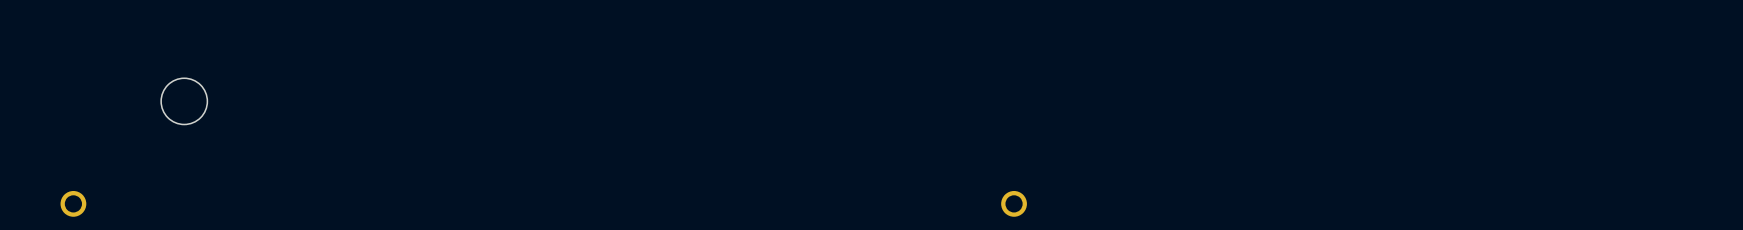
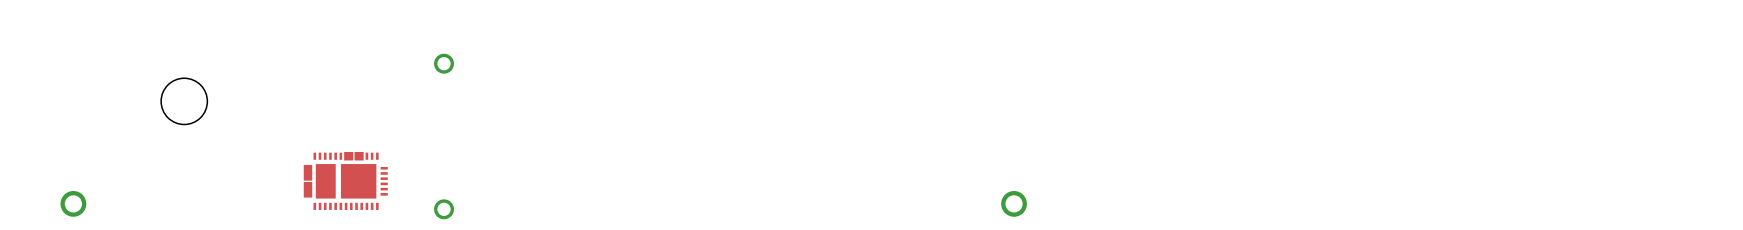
part: none -> (444, 63)
part: none -> (345, 180)
part: none -> (444, 209)

